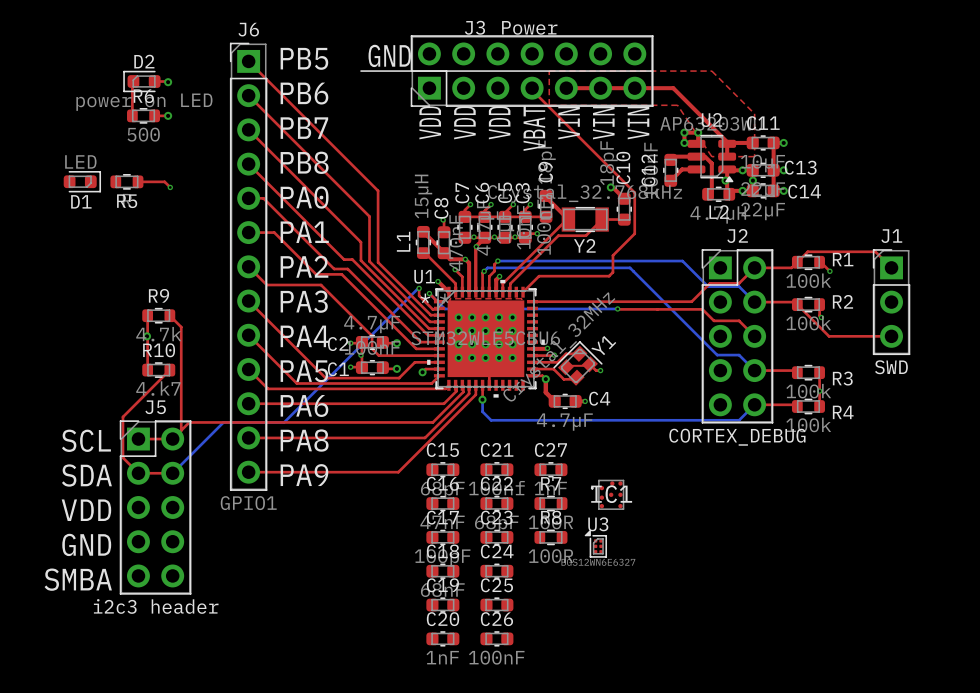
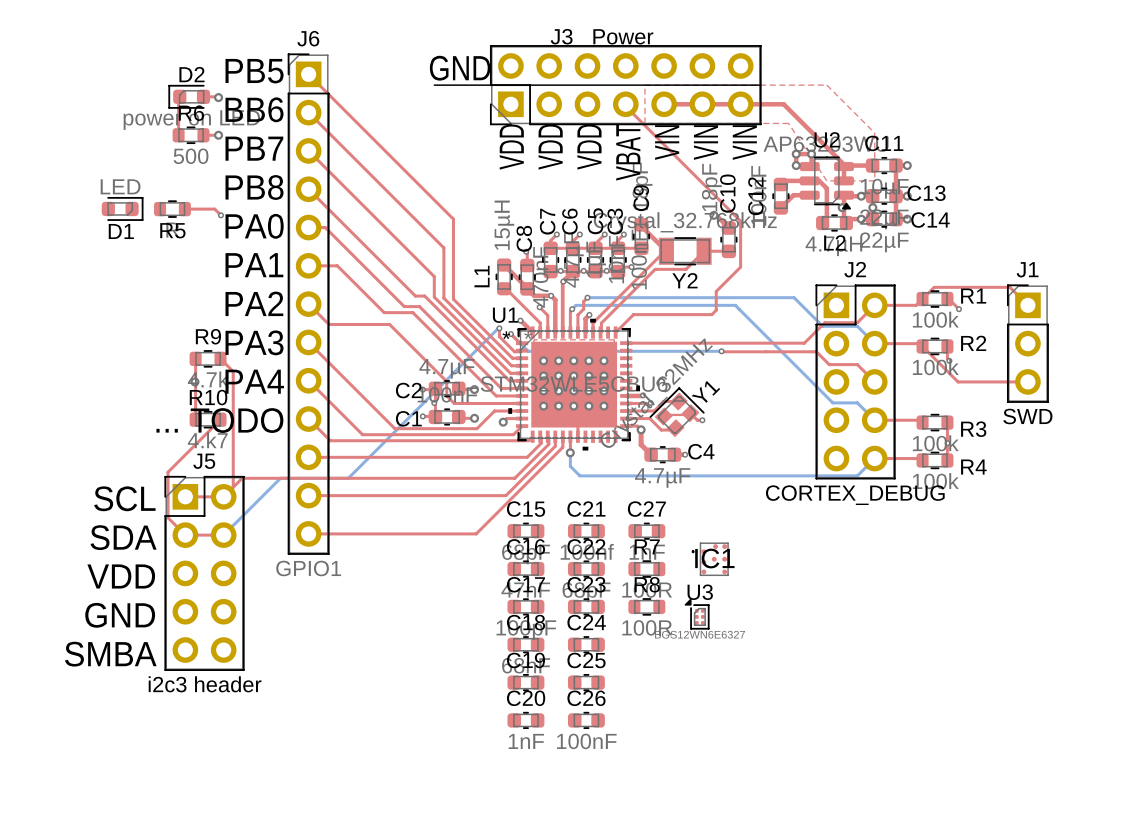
text position: PB5 (304, 58) -> PB5 (254, 71)
text: none -> BB6 (254, 109)
text: PB6 (304, 93) -> none
text position: PB7 (304, 128) -> PB7 (254, 148)
text position: PB8 (304, 162) -> PB8 (254, 187)
text position: PA0 (304, 197) -> PA0 (254, 226)
text position: PA1 (304, 232) -> PA1 (254, 265)
text position: PA2 (304, 266) -> PA2 (254, 303)
text position: PA3 (304, 301) -> PA3 (254, 342)
text position: PA4 (304, 336) -> PA4 (254, 381)
text: none -> ... TODO (219, 420)
text: PA5 (304, 371) -> none
text: PA6 (304, 406) -> none
text: PA8 (304, 440) -> none
text: PA9 (304, 475) -> none

